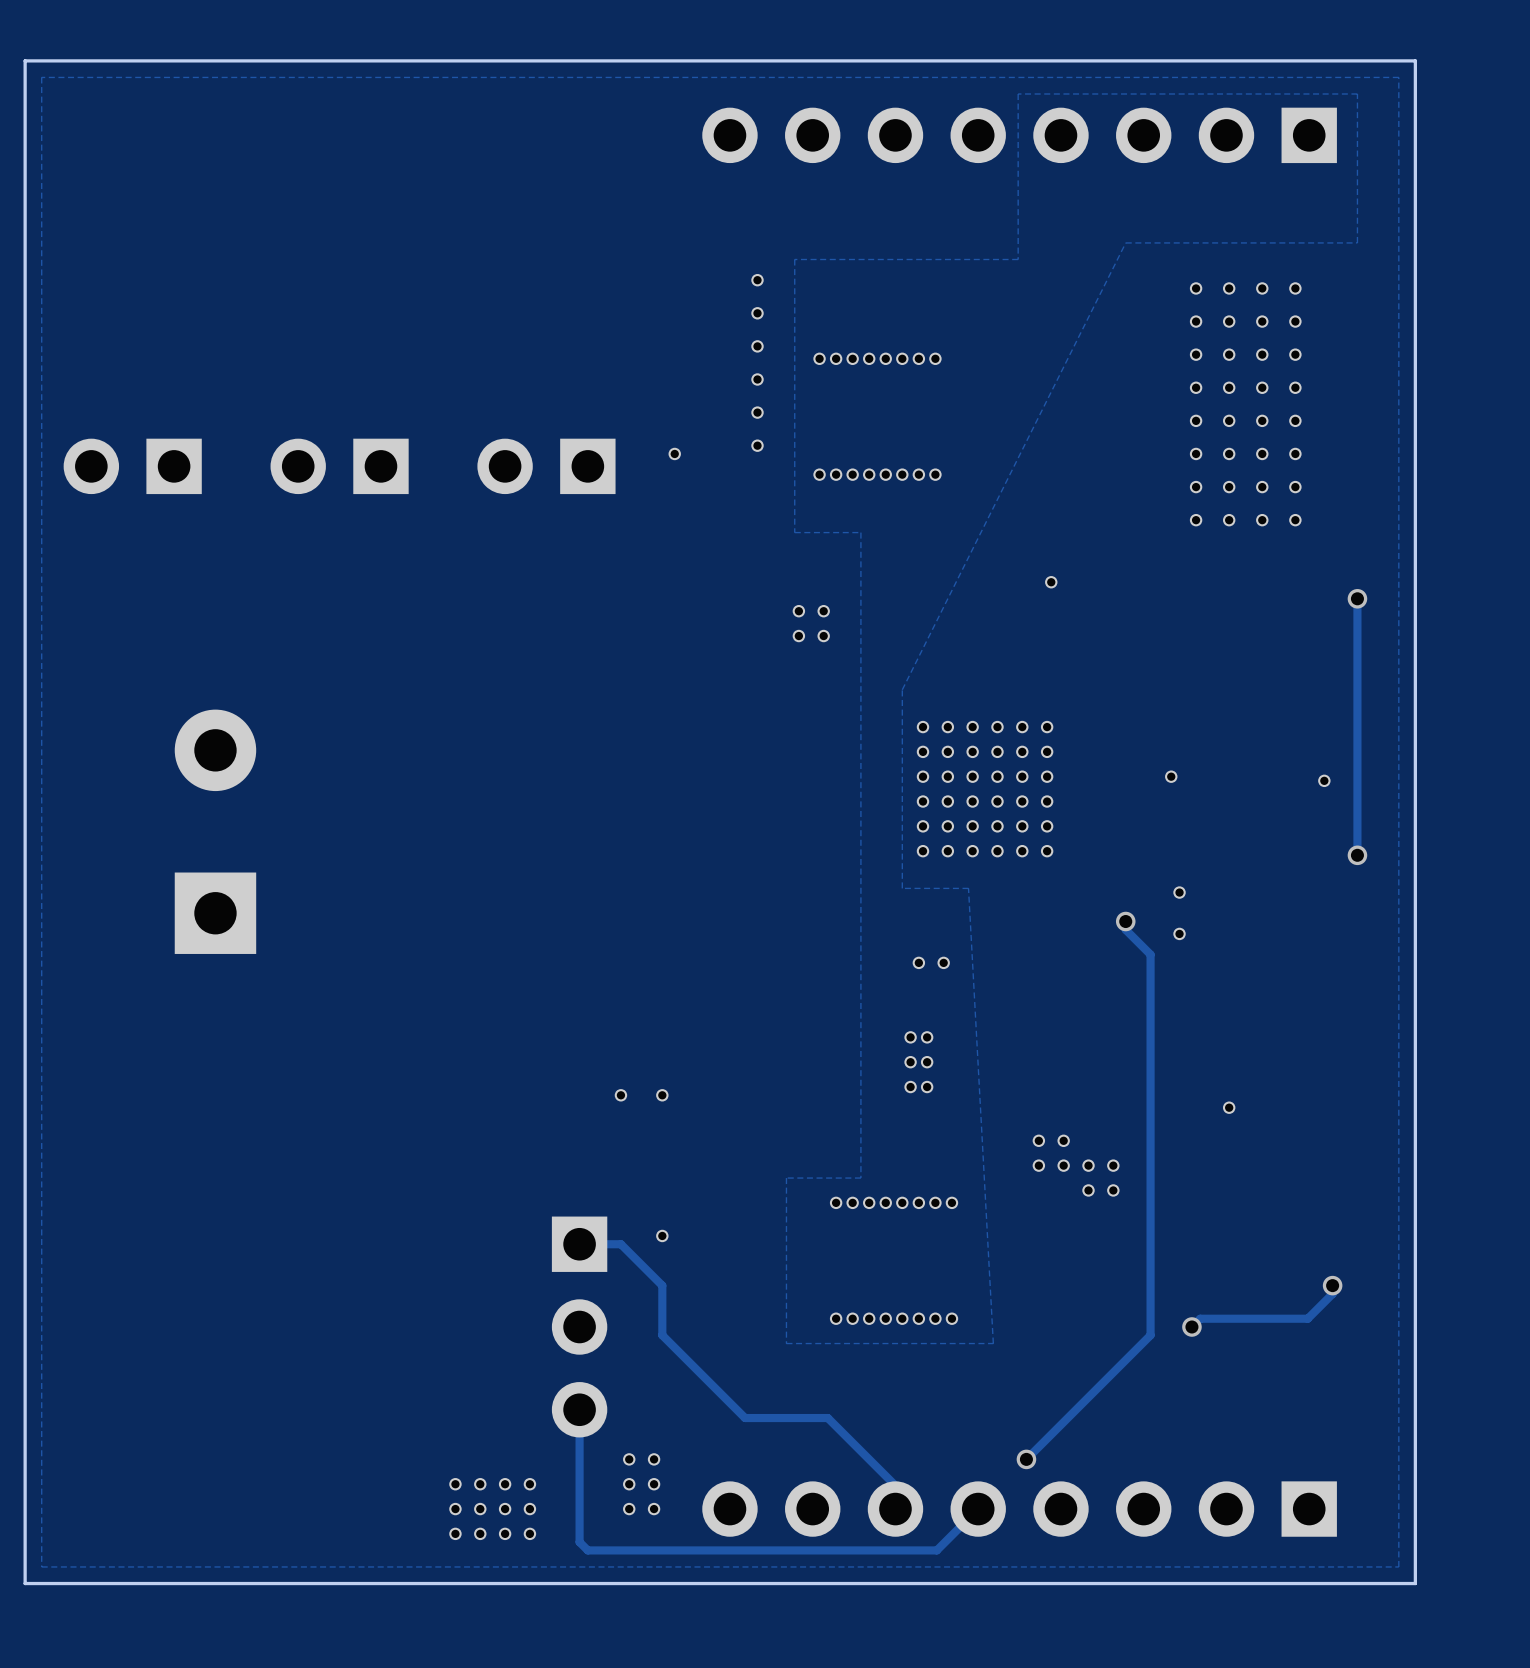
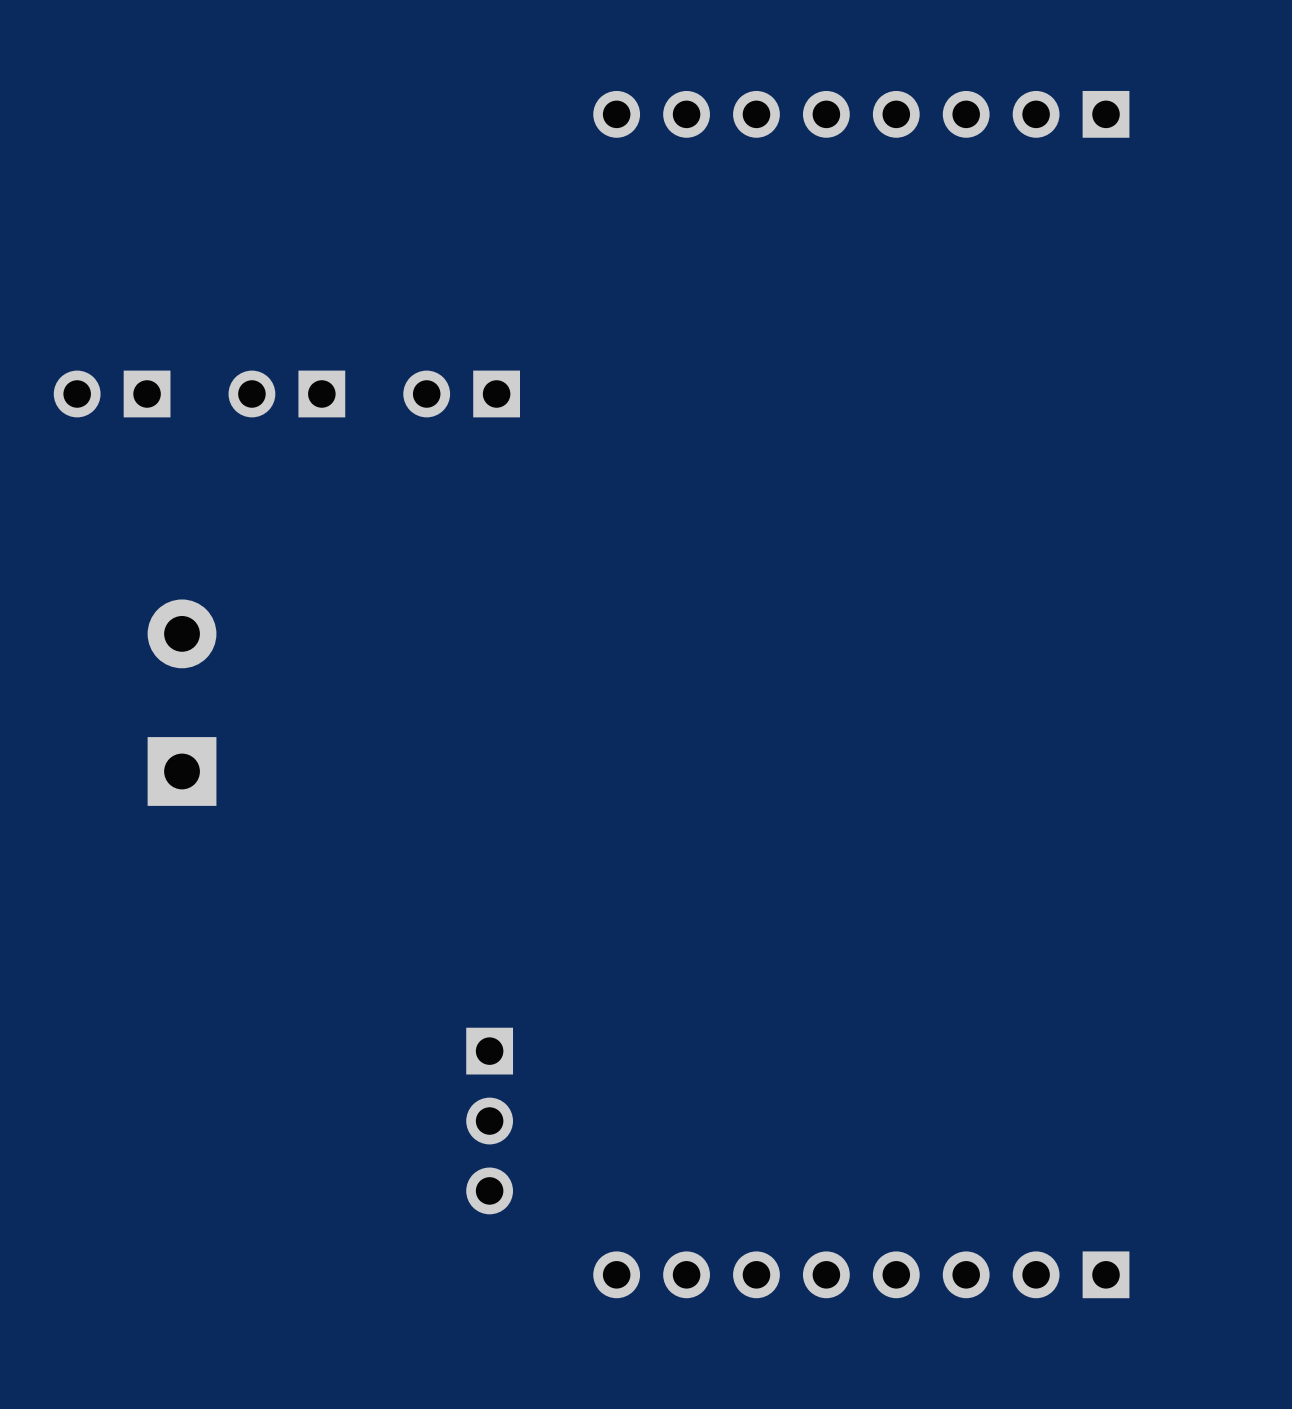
board edge: (1415, 60) (25, 60) (25, 1583) (1415, 1583) (1415, 60) -> none
zone outline: (1398, 77) (1398, 1566) (41, 1566) (41, 77) (1398, 77) -> none
zone outline: (1357, 94) (1018, 94) (1018, 259) (794, 259) (794, 532) (860, 532) (860, 1178) (786, 1178) (786, 1343) (993, 1343) (968, 888) (902, 888) (902, 689) (1125, 242) (1357, 242) (1357, 94) -> none
part: (757, 280) -> none
part: (1196, 288) -> none
part: (1229, 288) -> none
part: (1262, 288) -> none
part: (1295, 288) -> none
part: (757, 313) -> none
part: (1196, 321) -> none
part: (1229, 321) -> none
part: (1262, 321) -> none
part: (1295, 321) -> none
part: (757, 346) -> none
part: (1196, 354) -> none
part: (1229, 354) -> none
part: (1262, 354) -> none
part: (1295, 354) -> none
part: (819, 358) -> none
part: (836, 358) -> none
part: (852, 358) -> none
part: (869, 358) -> none
part: (885, 358) -> none
part: (902, 358) -> none
part: (918, 358) -> none
part: (935, 358) -> none
part: (757, 379) -> none
part: (1196, 387) -> none
part: (1229, 387) -> none
part: (1262, 387) -> none
part: (1295, 387) -> none
part: (757, 412) -> none
part: (1196, 420) -> none
part: (1229, 420) -> none
part: (1262, 420) -> none
part: (1295, 420) -> none
part: (757, 445) -> none
part: (674, 453) -> none
part: (1196, 453) -> none
part: (1229, 453) -> none
part: (1262, 453) -> none
part: (1295, 453) -> none
part: (819, 474) -> none
part: (836, 474) -> none
part: (852, 474) -> none
part: (869, 474) -> none
part: (885, 474) -> none
part: (902, 474) -> none
part: (918, 474) -> none
part: (935, 474) -> none
part: (1196, 487) -> none
part: (1229, 487) -> none
part: (1262, 487) -> none
part: (1295, 487) -> none
part: (1196, 520) -> none
part: (1229, 520) -> none
part: (1262, 520) -> none
part: (1295, 520) -> none
part: (1051, 582) -> none
track: (1357, 598) (1357, 855) -> none
via: (1357, 598) -> none
part: (798, 611) -> none
part: (823, 611) -> none
part: (798, 636) -> none
part: (823, 636) -> none
part: (923, 727) -> none
part: (947, 727) -> none
part: (972, 727) -> none
part: (997, 727) -> none
part: (1022, 727) -> none
part: (1047, 727) -> none
part: (923, 751) -> none
part: (947, 751) -> none
part: (972, 751) -> none
part: (997, 751) -> none
part: (1022, 751) -> none
part: (1047, 751) -> none
part: (923, 776) -> none
part: (947, 776) -> none
part: (972, 776) -> none
part: (997, 776) -> none
part: (1022, 776) -> none
part: (1047, 776) -> none
part: (1171, 776) -> none
part: (1324, 780) -> none
part: (923, 801) -> none
part: (947, 801) -> none
part: (972, 801) -> none
part: (997, 801) -> none
part: (1022, 801) -> none
part: (1047, 801) -> none
part: (923, 826) -> none
part: (947, 826) -> none
part: (972, 826) -> none
part: (997, 826) -> none
part: (1022, 826) -> none
part: (1047, 826) -> none
part: (923, 851) -> none
part: (947, 851) -> none
part: (972, 851) -> none
part: (997, 851) -> none
part: (1022, 851) -> none
part: (1047, 851) -> none
via: (1357, 855) -> none
part: (1179, 892) -> none
track: (1125, 921) (1125, 929) (1150, 954) (1150, 1335) (1026, 1459) -> none
via: (1125, 921) -> none
part: (1179, 933) -> none
part: (918, 962) -> none
part: (943, 962) -> none
part: (910, 1037) -> none
part: (927, 1037) -> none
part: (910, 1062) -> none
part: (927, 1062) -> none
part: (910, 1087) -> none
part: (927, 1087) -> none
part: (620, 1095) -> none
part: (662, 1095) -> none
part: (1229, 1107) -> none
part: (1038, 1140) -> none
part: (1063, 1140) -> none
part: (1038, 1165) -> none
part: (1063, 1165) -> none
part: (1088, 1165) -> none
part: (1113, 1165) -> none
part: (1088, 1190) -> none
part: (1113, 1190) -> none
part: (836, 1202) -> none
part: (852, 1202) -> none
part: (869, 1202) -> none
part: (885, 1202) -> none
part: (902, 1202) -> none
part: (918, 1202) -> none
part: (935, 1202) -> none
part: (951, 1202) -> none
part: (662, 1235) -> none
track: (579, 1244) (620, 1244) (662, 1285) (662, 1335) (745, 1418) (827, 1418) (895, 1485) (895, 1509) -> none
track: (1332, 1285) (1332, 1293) (1307, 1318) (1200, 1318) (1191, 1327) -> none
via: (1332, 1285) -> none
part: (836, 1318) -> none
part: (852, 1318) -> none
part: (869, 1318) -> none
part: (885, 1318) -> none
part: (902, 1318) -> none
part: (918, 1318) -> none
part: (935, 1318) -> none
part: (951, 1318) -> none
via: (1191, 1327) -> none
track: (579, 1409) (579, 1542) (587, 1550) (936, 1550) (978, 1509) -> none
part: (629, 1459) -> none
part: (654, 1459) -> none
via: (1026, 1459) -> none
part: (455, 1484) -> none
part: (480, 1484) -> none
part: (505, 1484) -> none
part: (529, 1484) -> none
part: (629, 1484) -> none
part: (654, 1484) -> none
part: (455, 1509) -> none
part: (480, 1509) -> none
part: (505, 1509) -> none
part: (529, 1509) -> none
part: (629, 1509) -> none
part: (654, 1509) -> none
part: (455, 1533) -> none
part: (480, 1533) -> none
part: (505, 1533) -> none
part: (529, 1533) -> none

